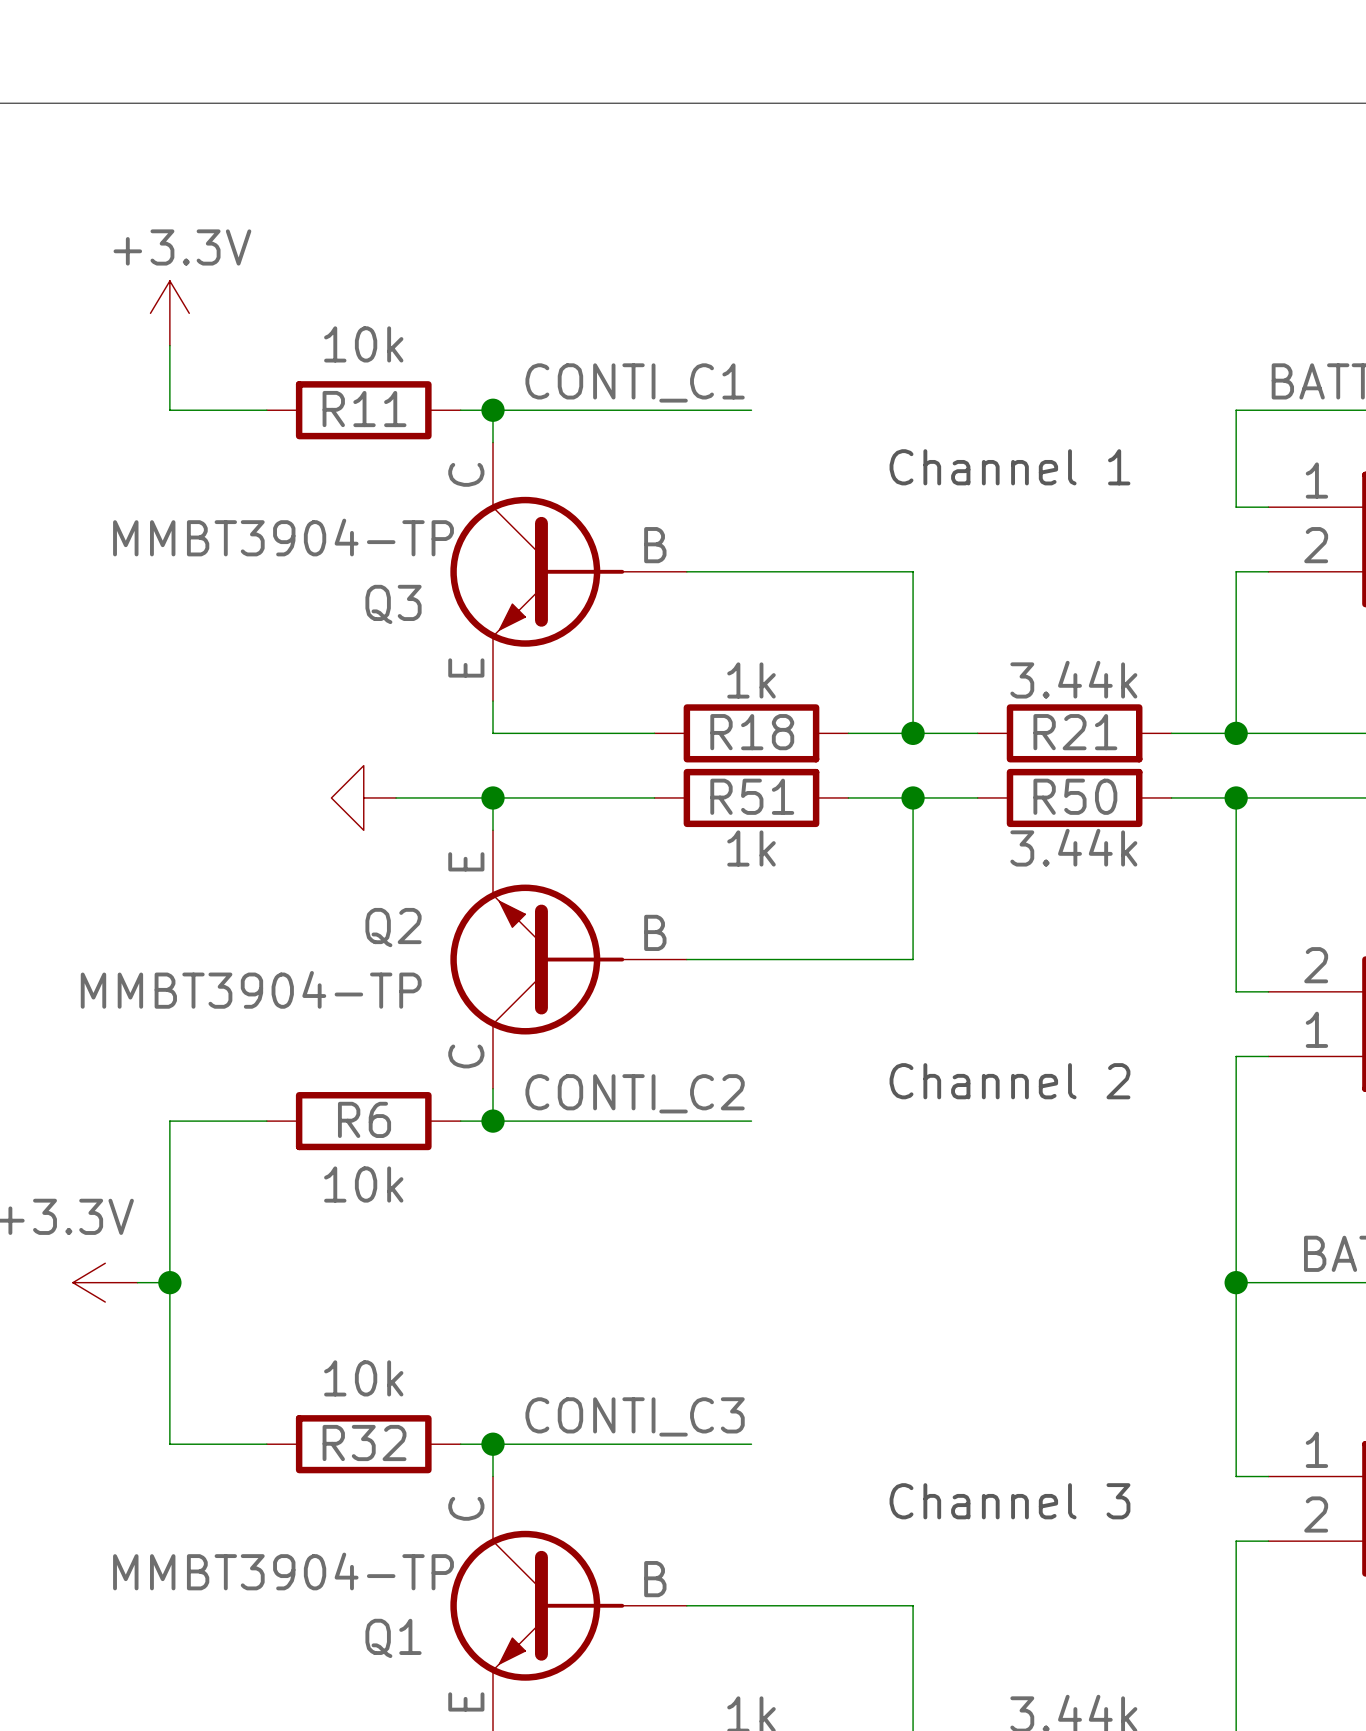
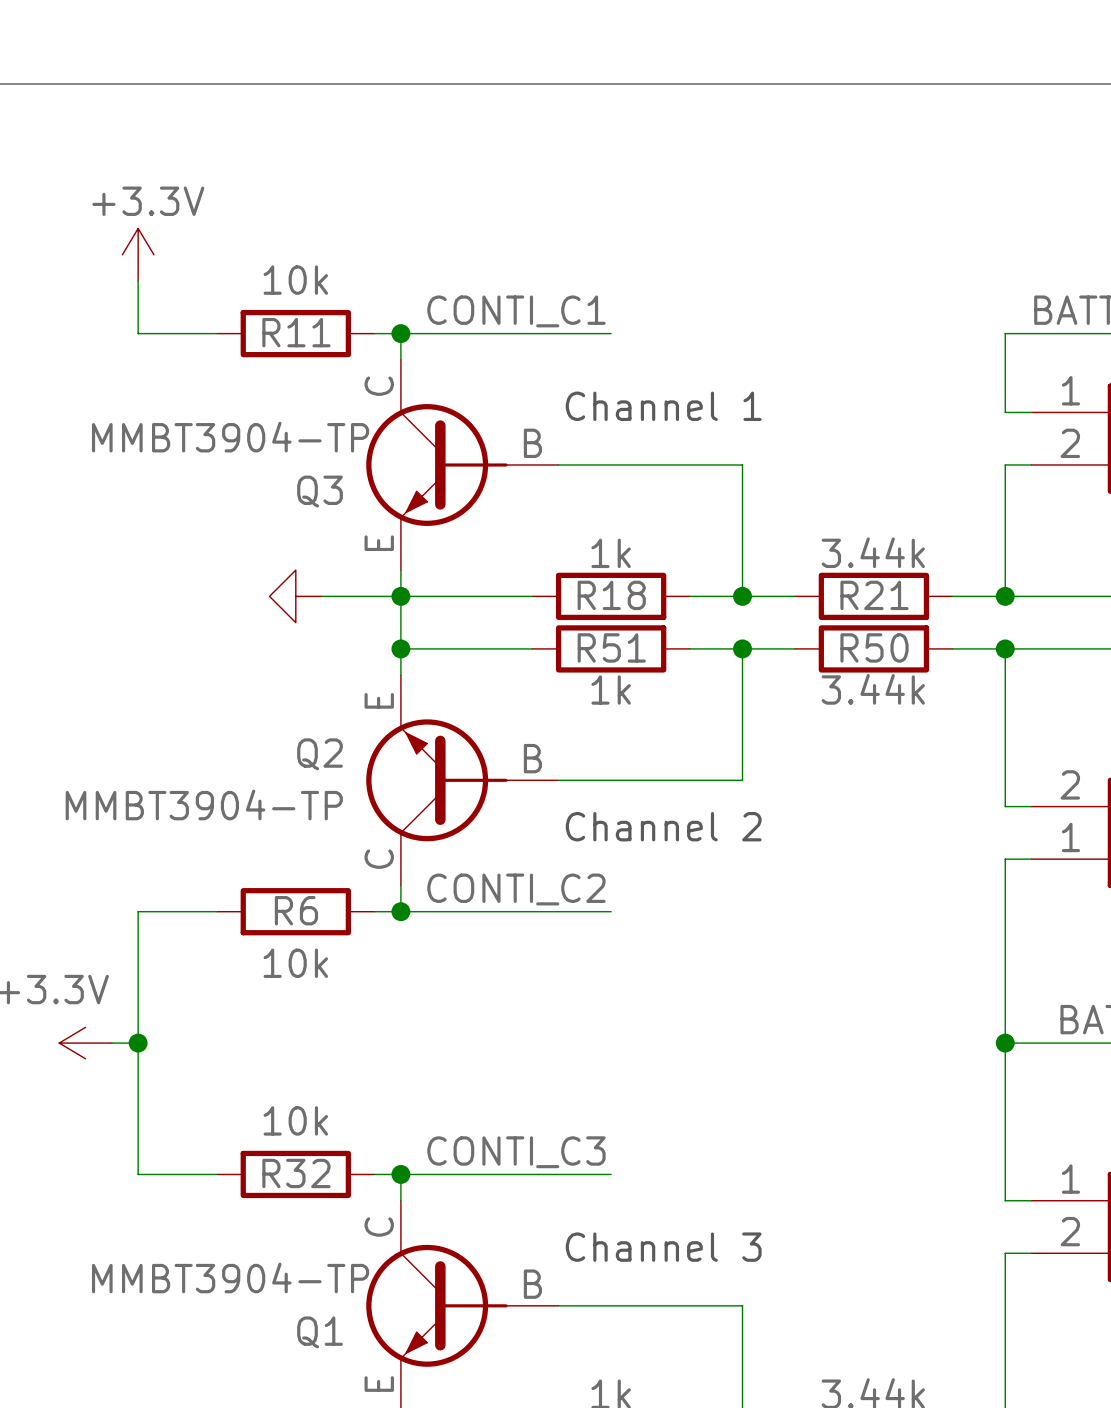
text position: Channel 1 (1009, 467) -> Channel 1 (663, 406)
junction: none -> (400, 596)
power symbol position: (363, 797) -> (295, 596)
wire: (396, 797) (493, 797) -> (322, 596) (400, 596) (400, 648)
text position: Channel 2 (1009, 1081) -> Channel 2 (663, 826)
text position: Channel 3 (1009, 1501) -> Channel 3 (663, 1247)

